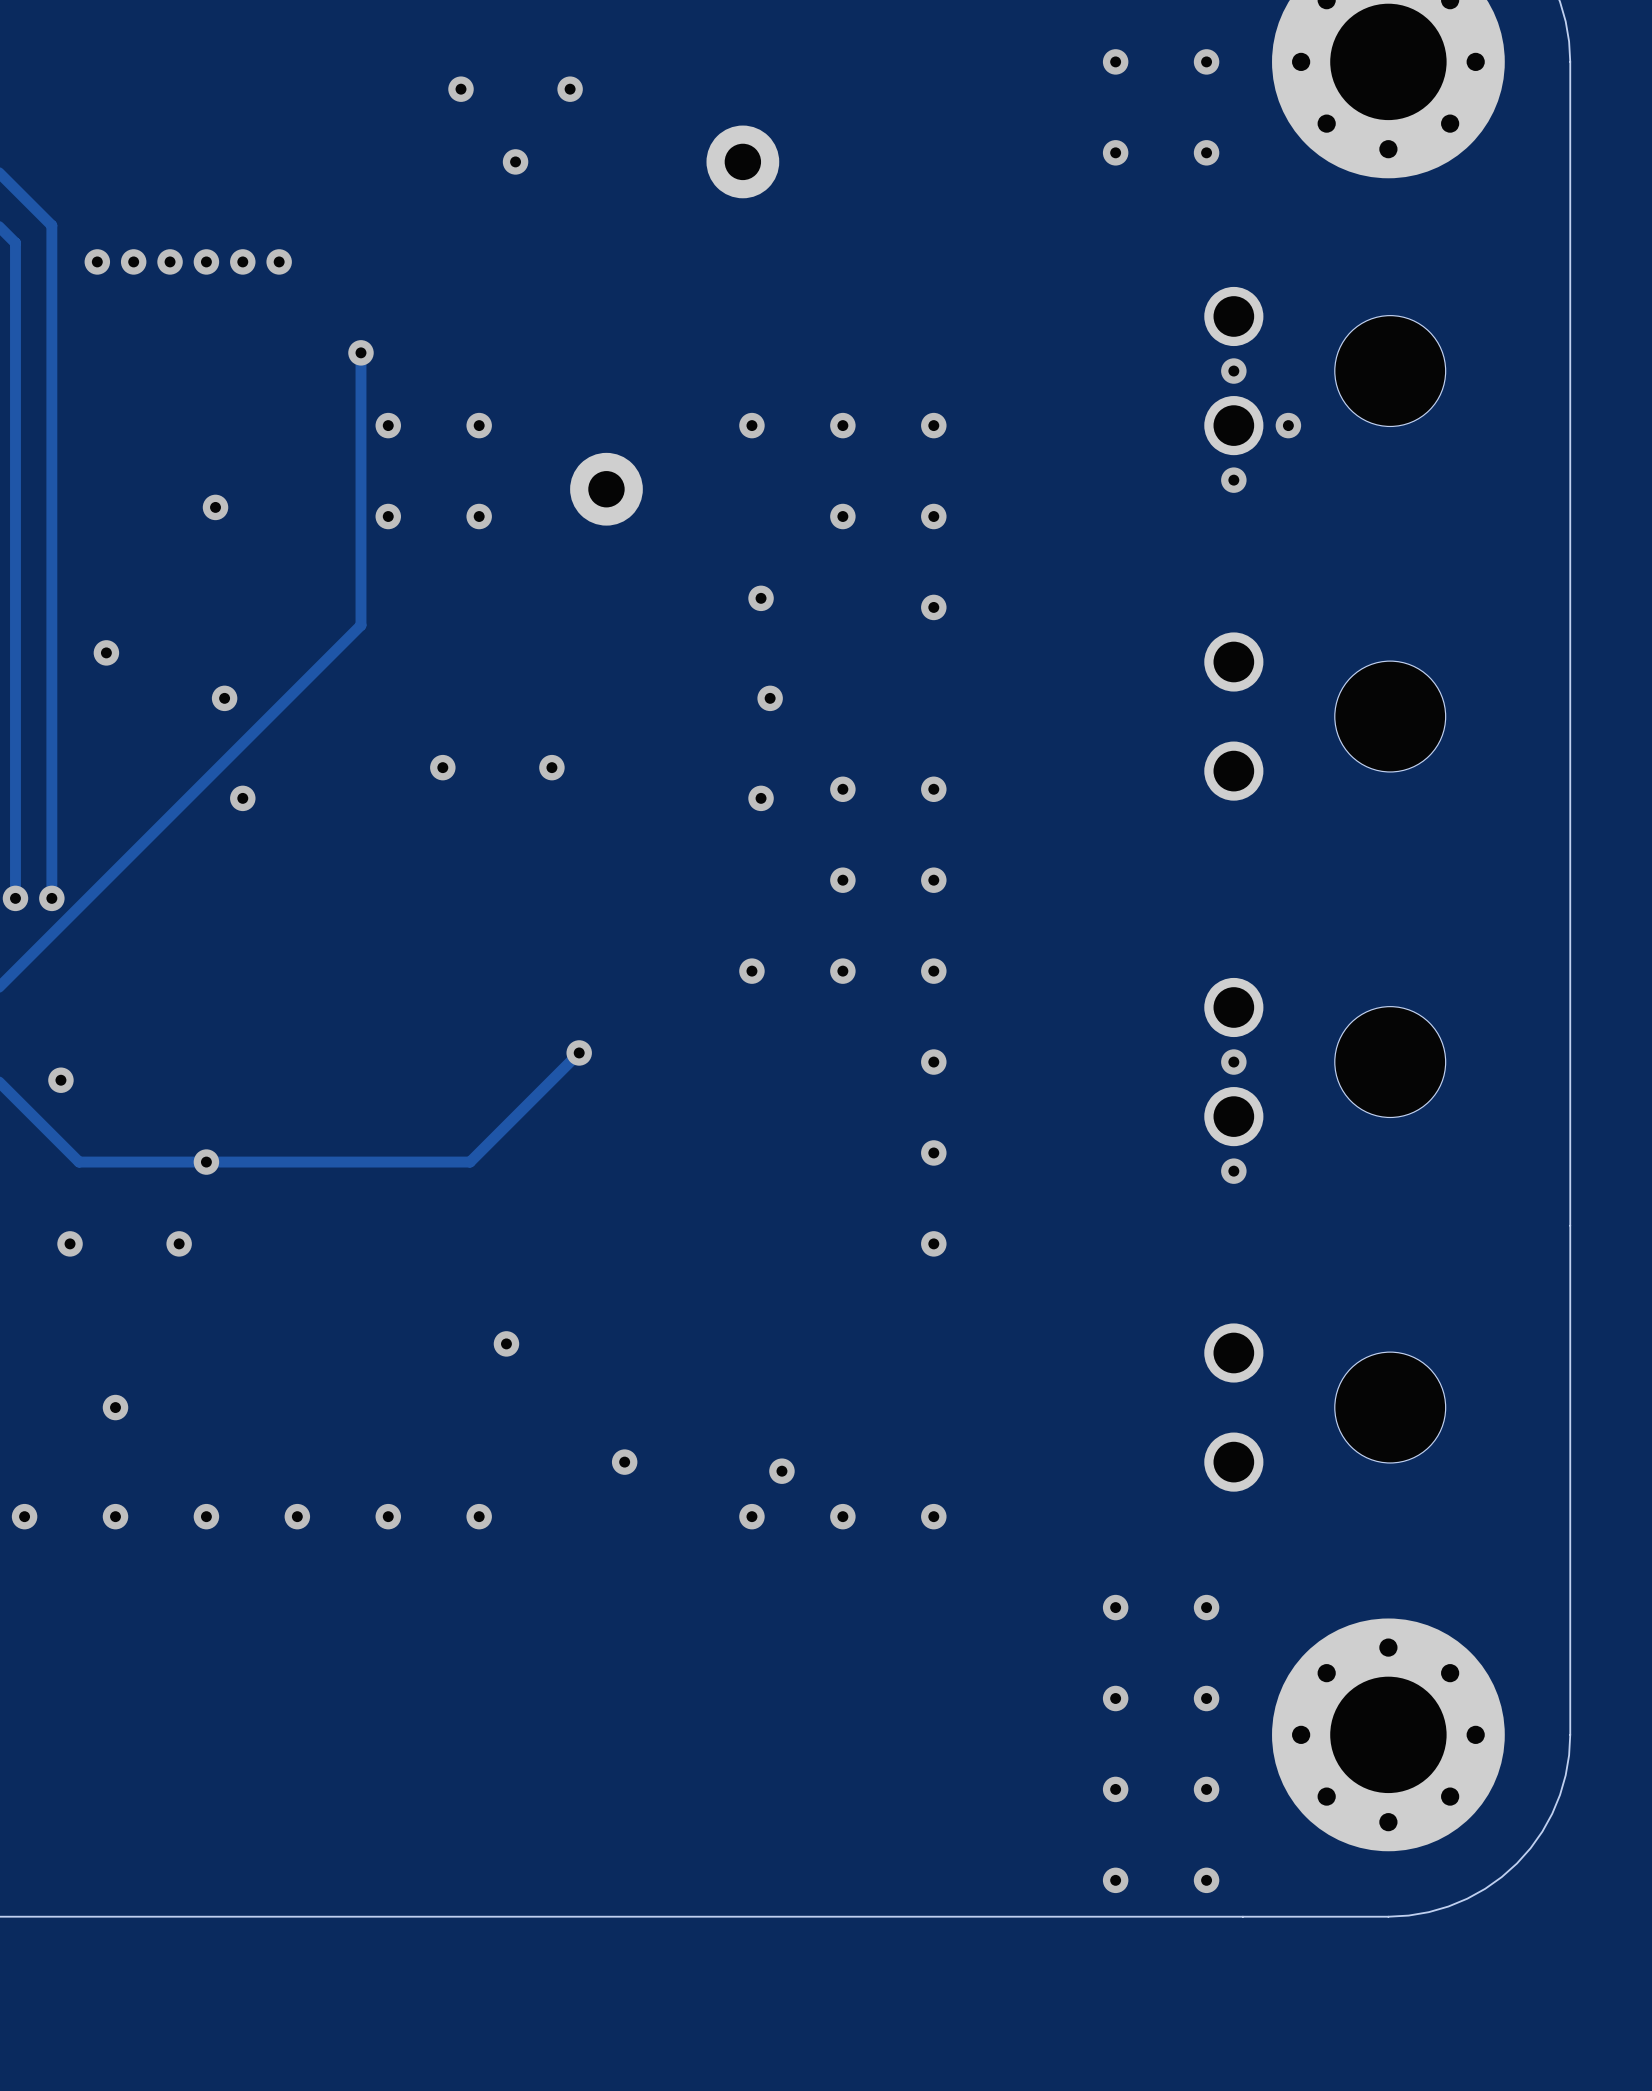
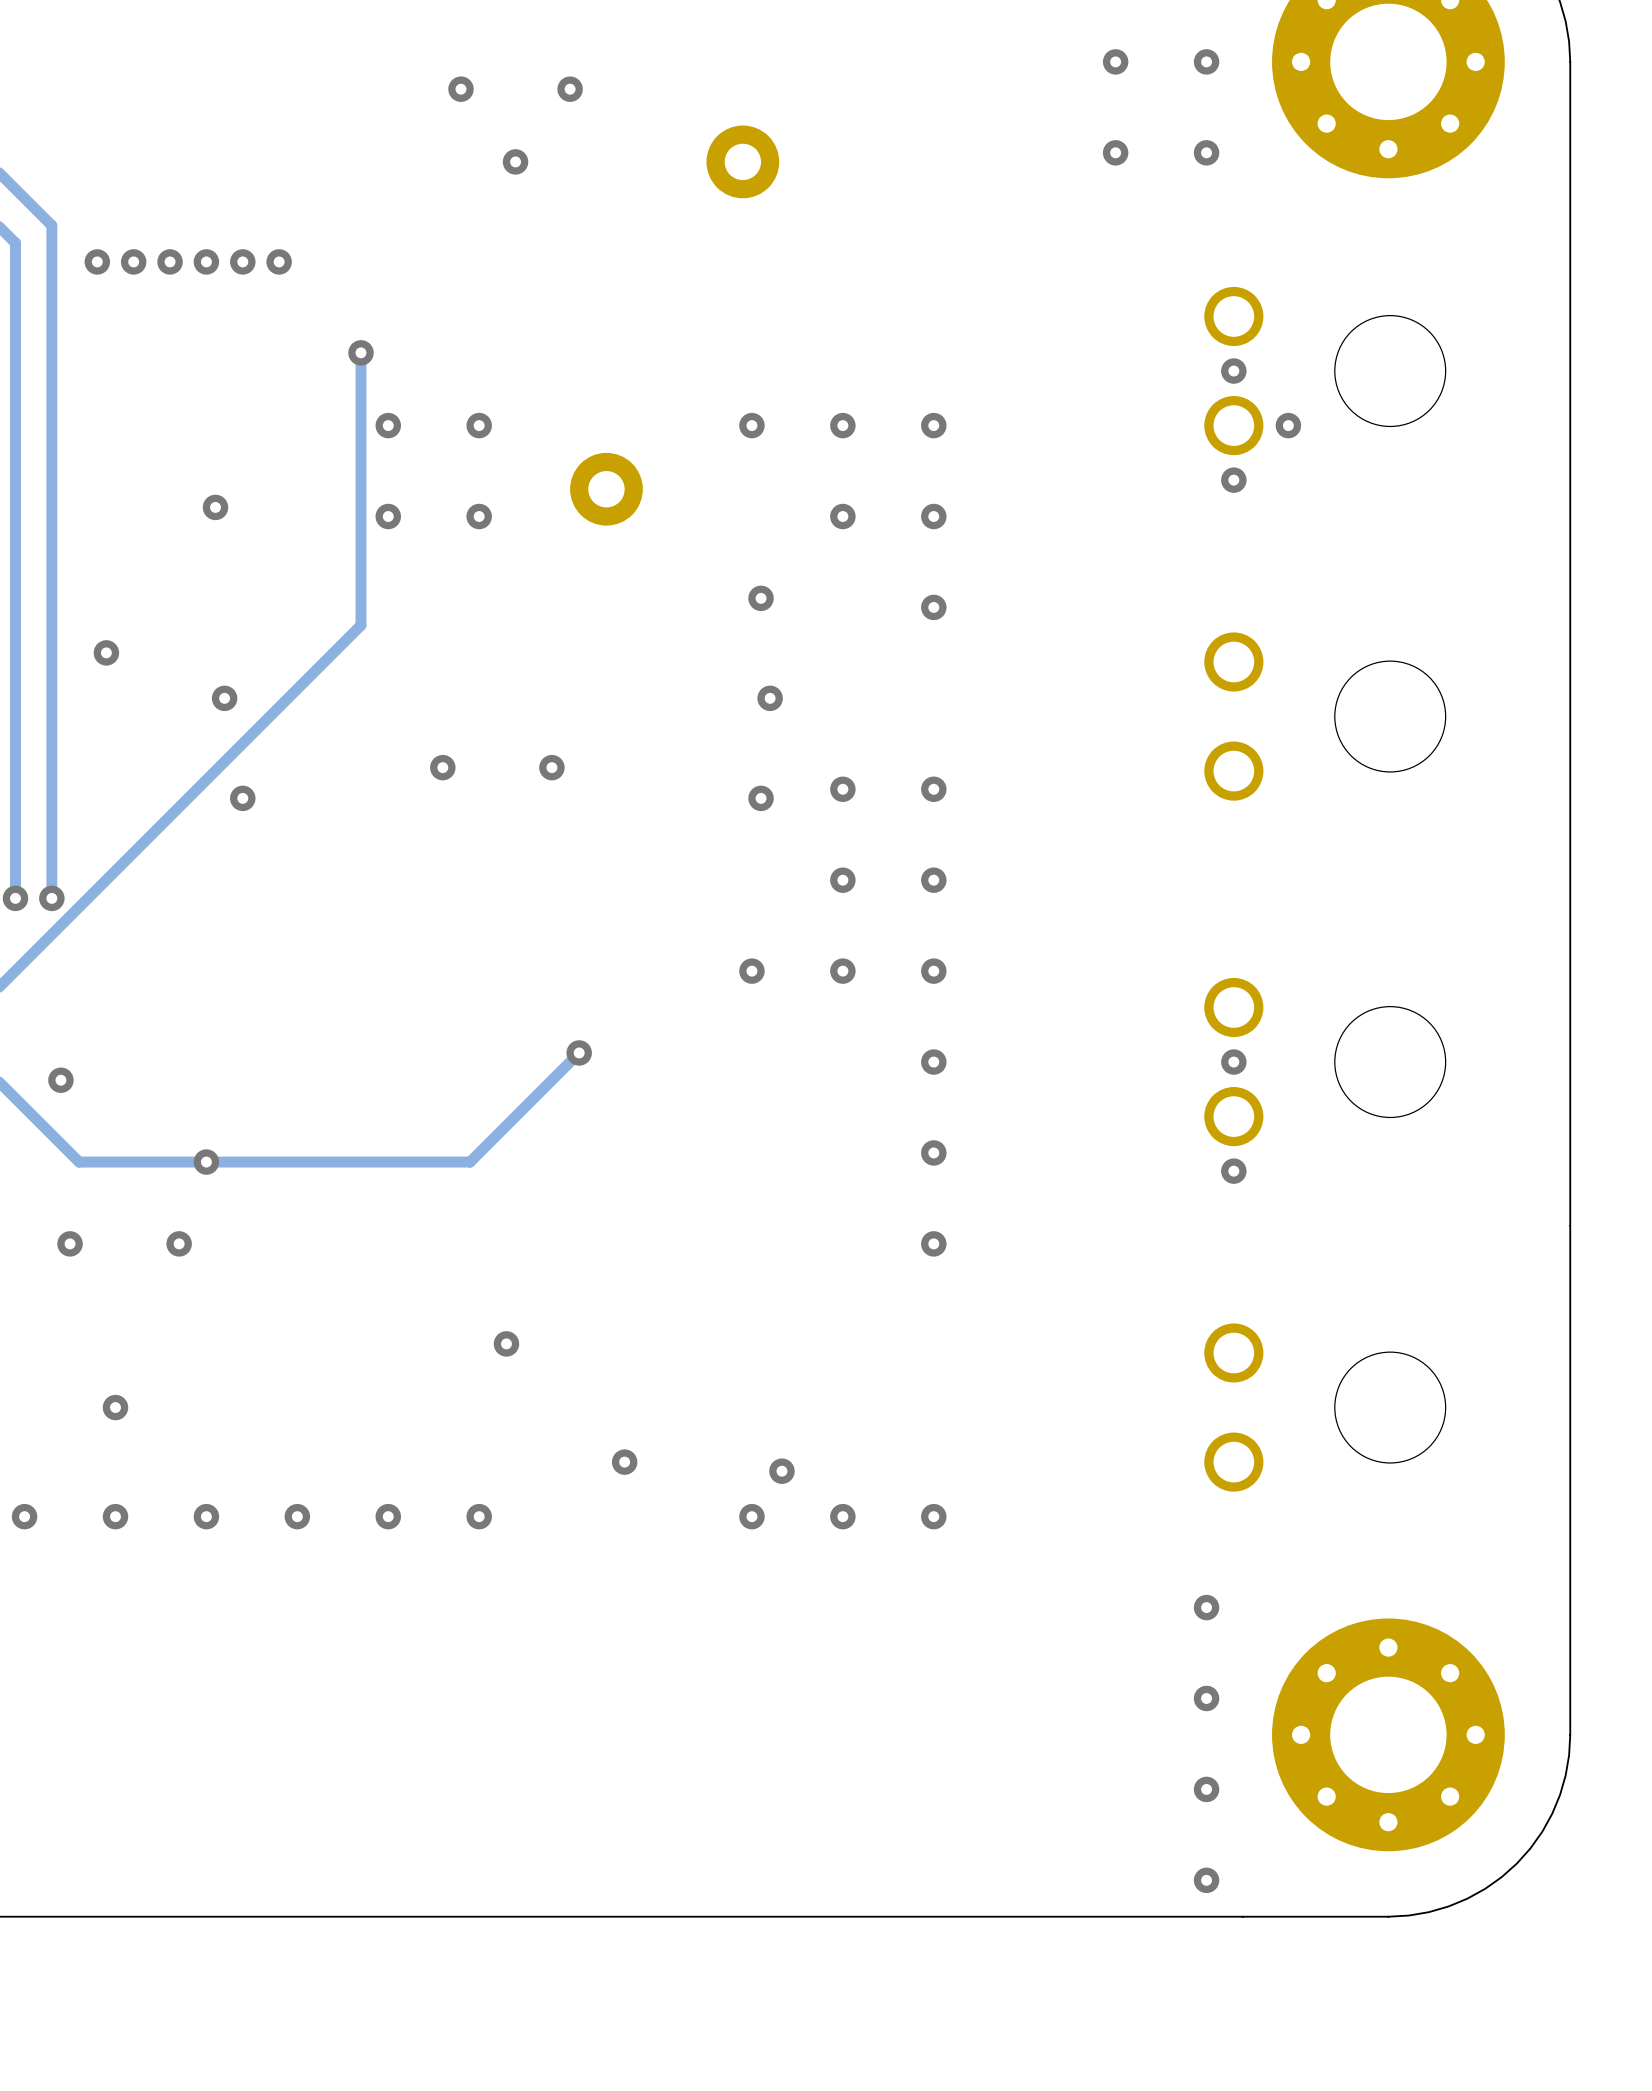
via: (1115, 1607) -> none
via: (1115, 1698) -> none
via: (1115, 1789) -> none
via: (1115, 1880) -> none

